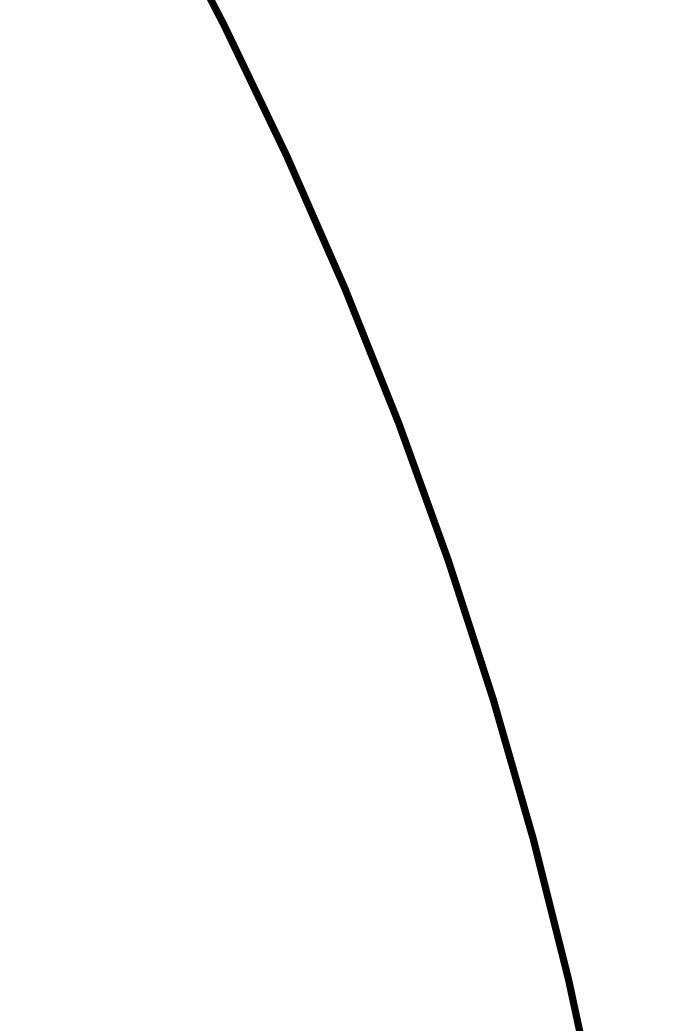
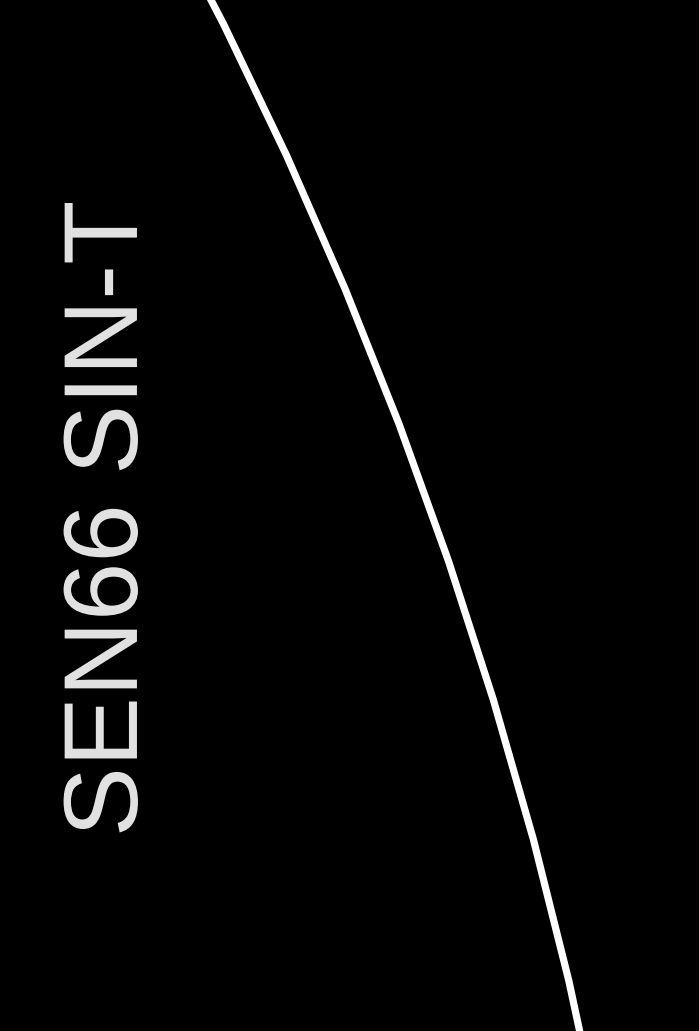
text: none -> SEN66 SIN-T (100, 517)

